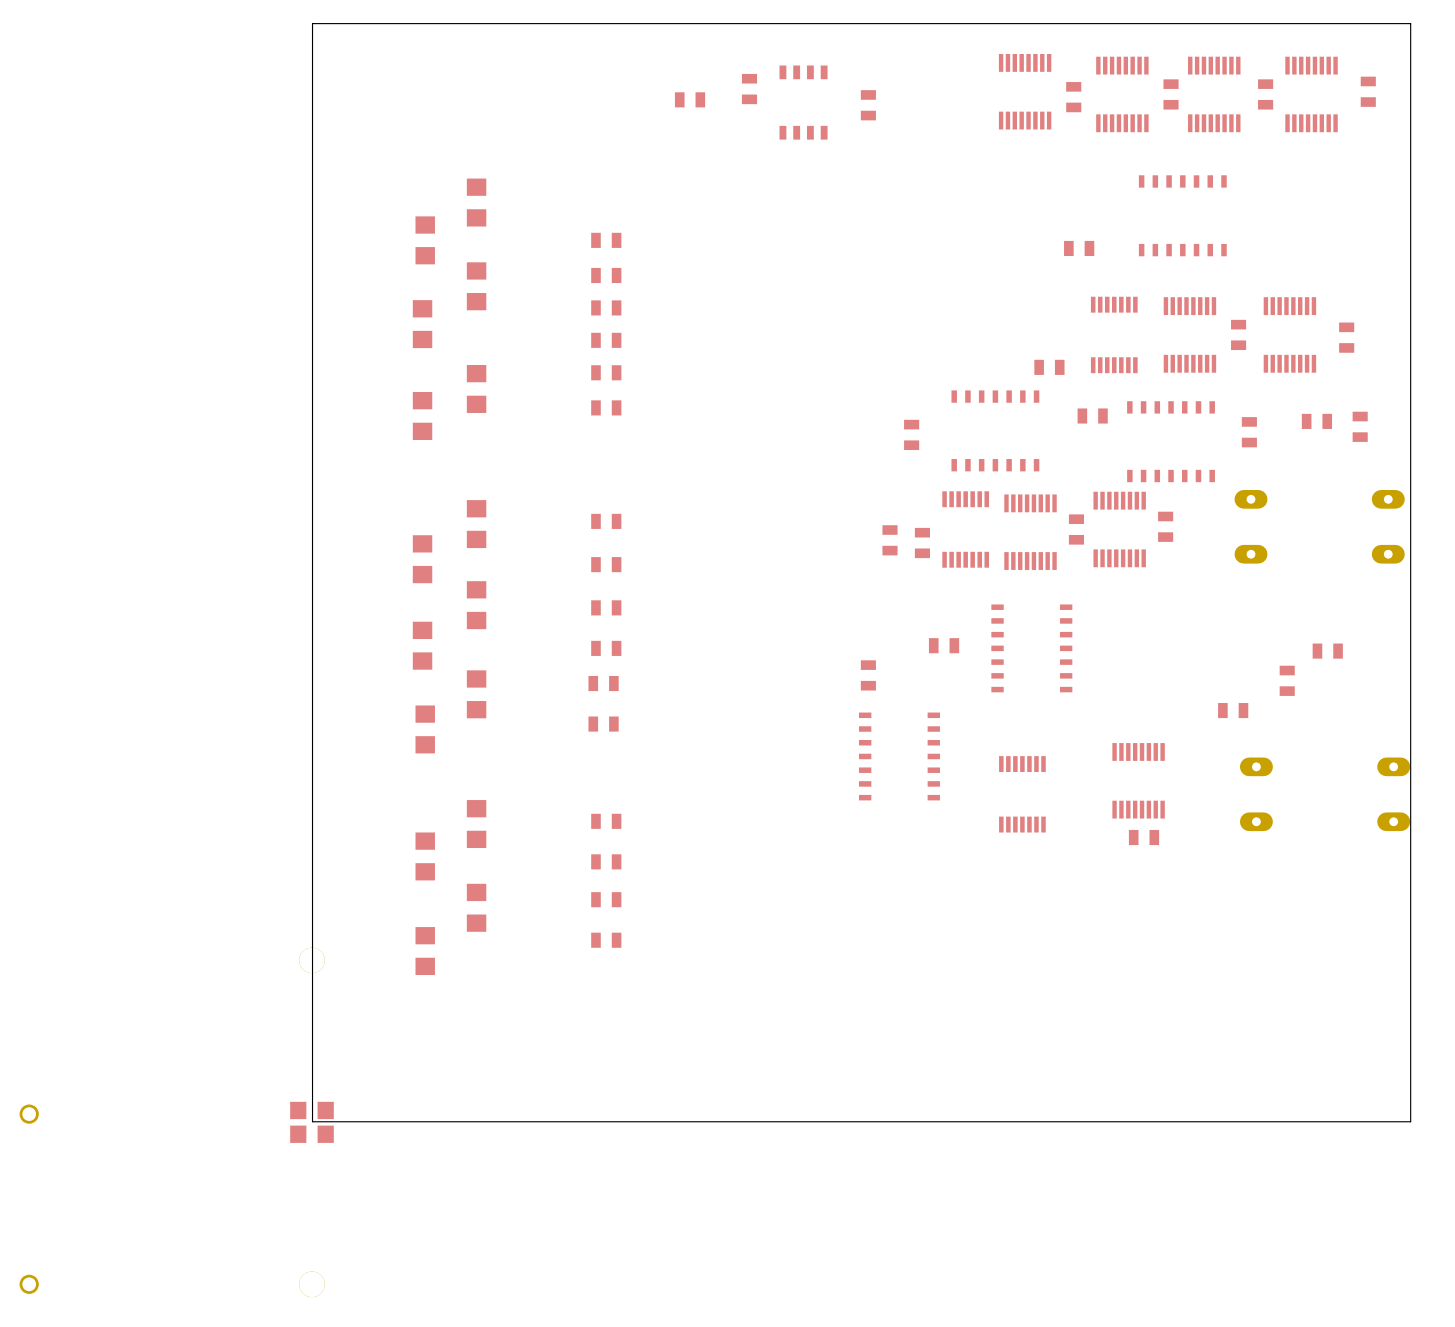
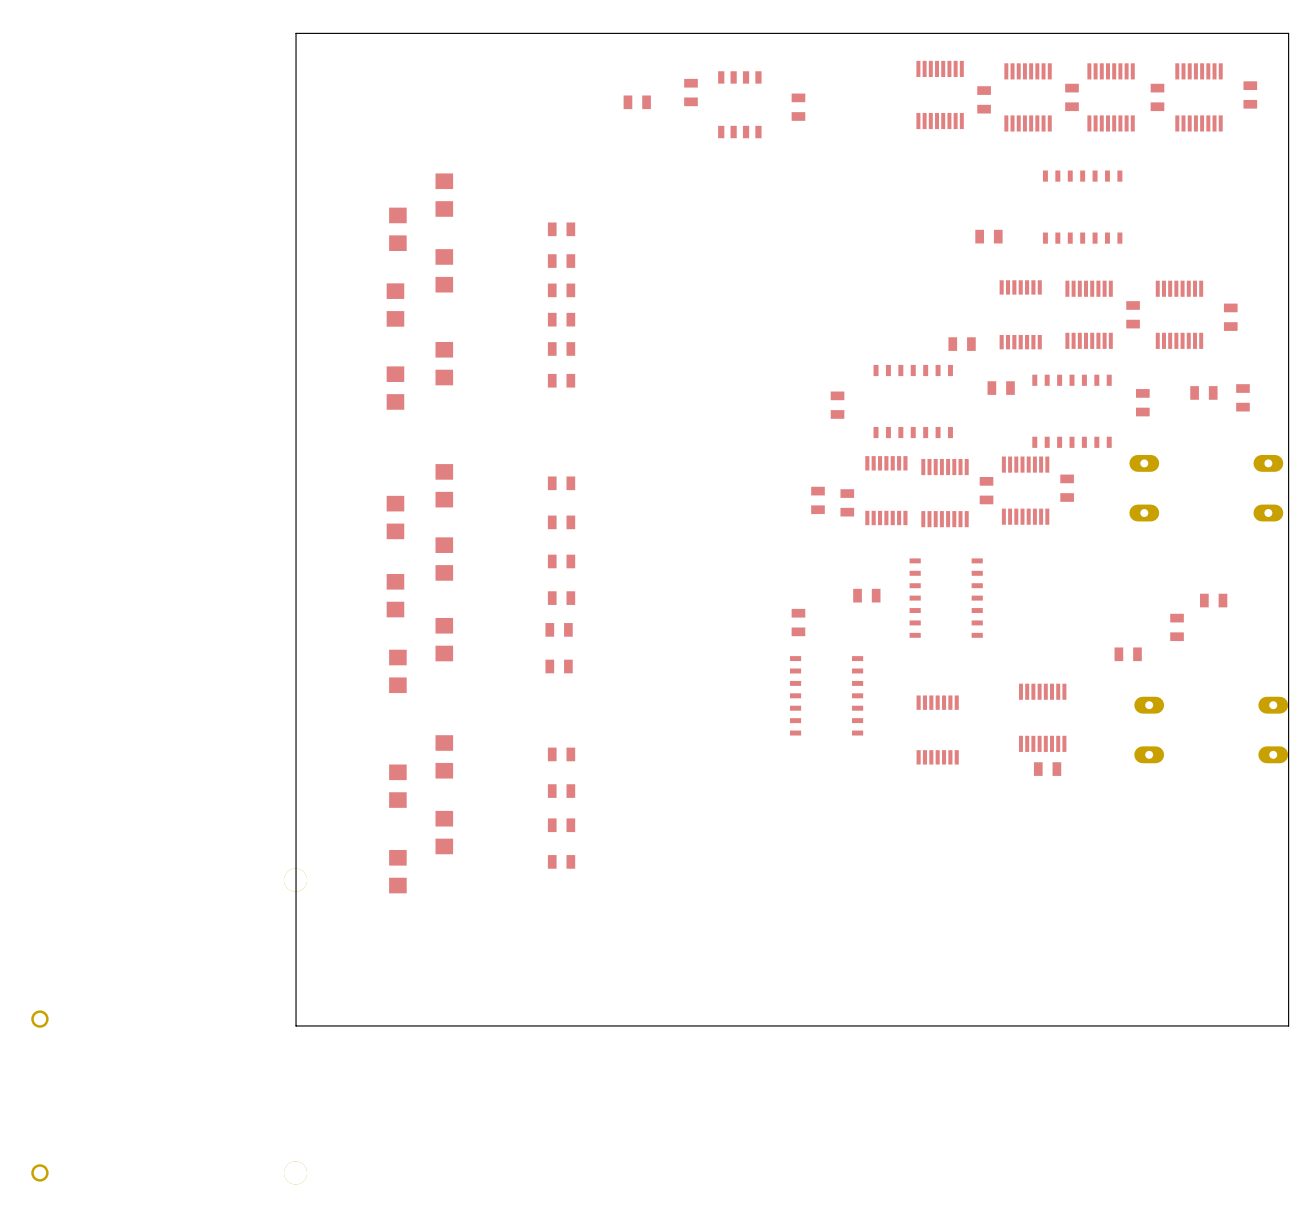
part: (311, 1122) -> none

